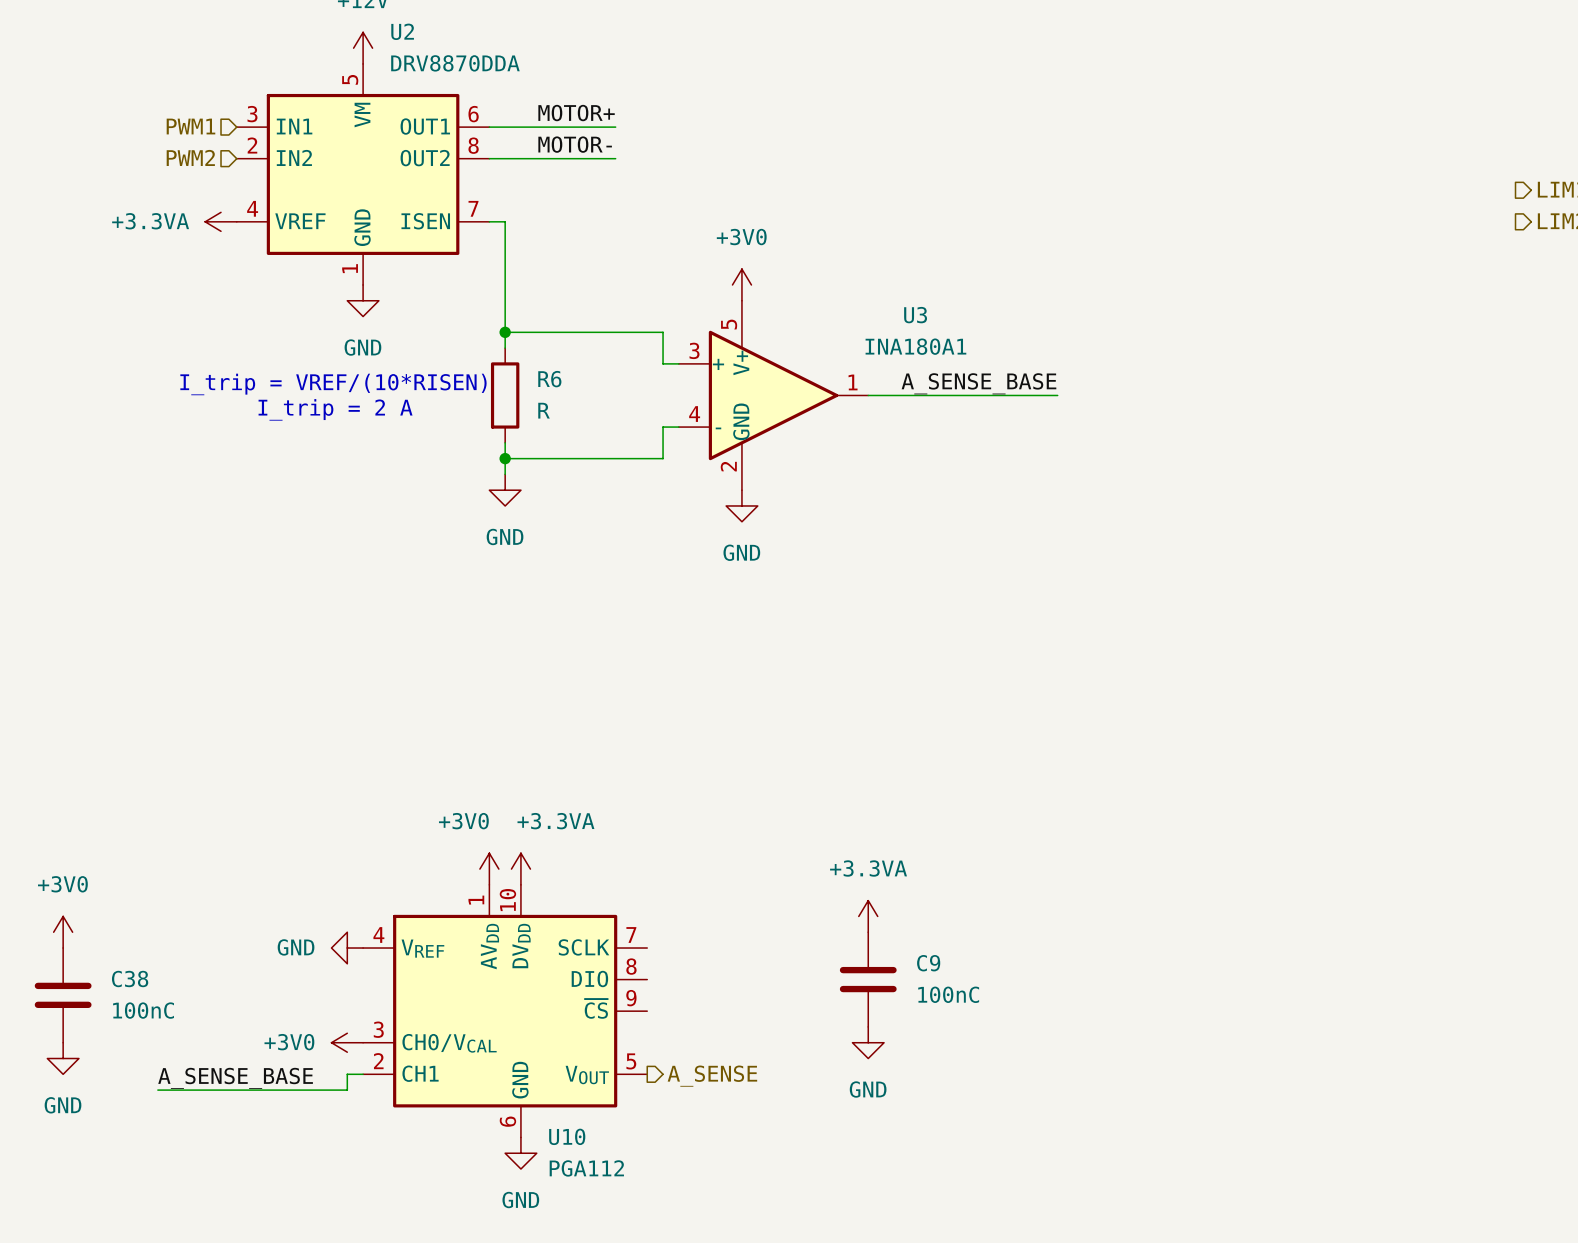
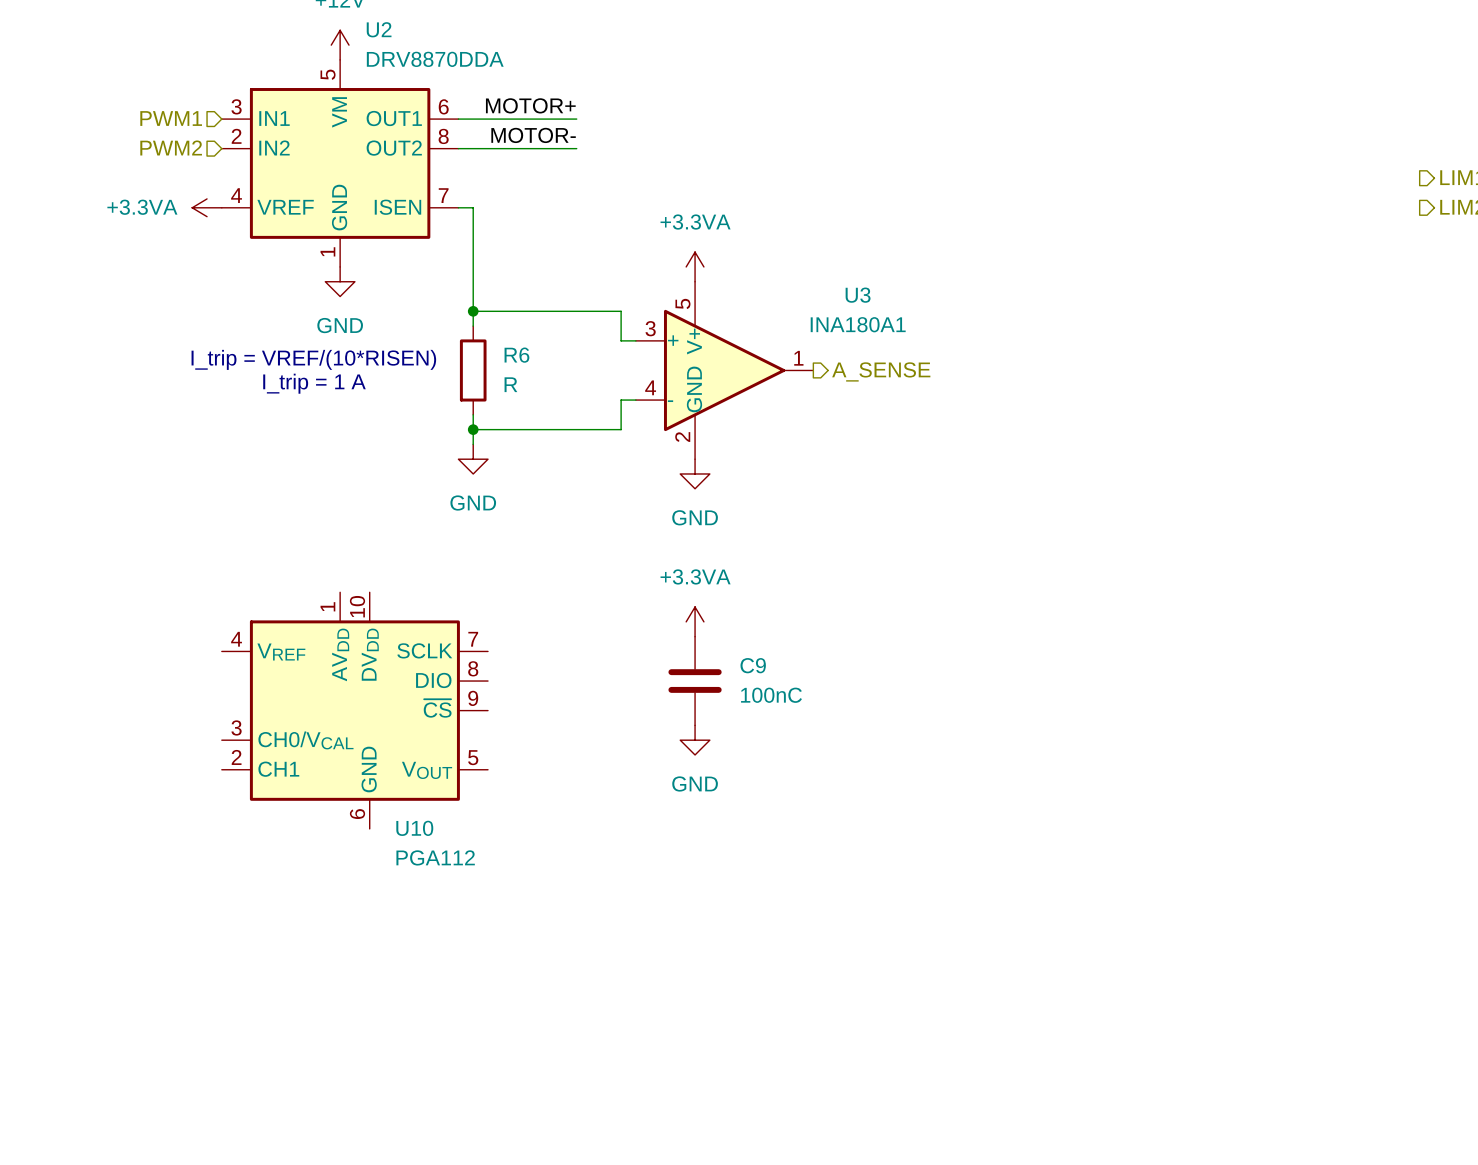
power symbol: +3V0 (741, 284) -> +3.3VA (695, 266)
label: A_SENSE_BASE (978, 383) -> none
wire: (868, 395) (1057, 395) -> none
hierarchical label: none -> A_SENSE (881, 371)
text: I_trip = 2 A (335, 409) -> I_trip = 1 A (314, 383)
power symbol: none -> +3.3VA (695, 621)
power symbol: none -> GND (695, 740)
power symbol: +3V0 (489, 869) -> none
power symbol: +3.3VA (520, 869) -> none
power symbol: +3.3VA (868, 916) -> none
power symbol: +3V0 (63, 932) -> none
power symbol: GND (347, 948) -> none
C9 position: (868, 979) -> (695, 681)
C38: 100nC (63, 995) -> none
U10 position: (505, 1011) -> (354, 710)
power symbol: +3V0 (347, 1042) -> none
power symbol: GND (868, 1042) -> none
power symbol: GND (63, 1058) -> none
wire: (363, 1074) (347, 1074) (347, 1090) (157, 1090) -> none
hierarchical label: A_SENSE (712, 1076) -> none
label: A_SENSE_BASE (235, 1078) -> none
power symbol: GND (520, 1153) -> none

